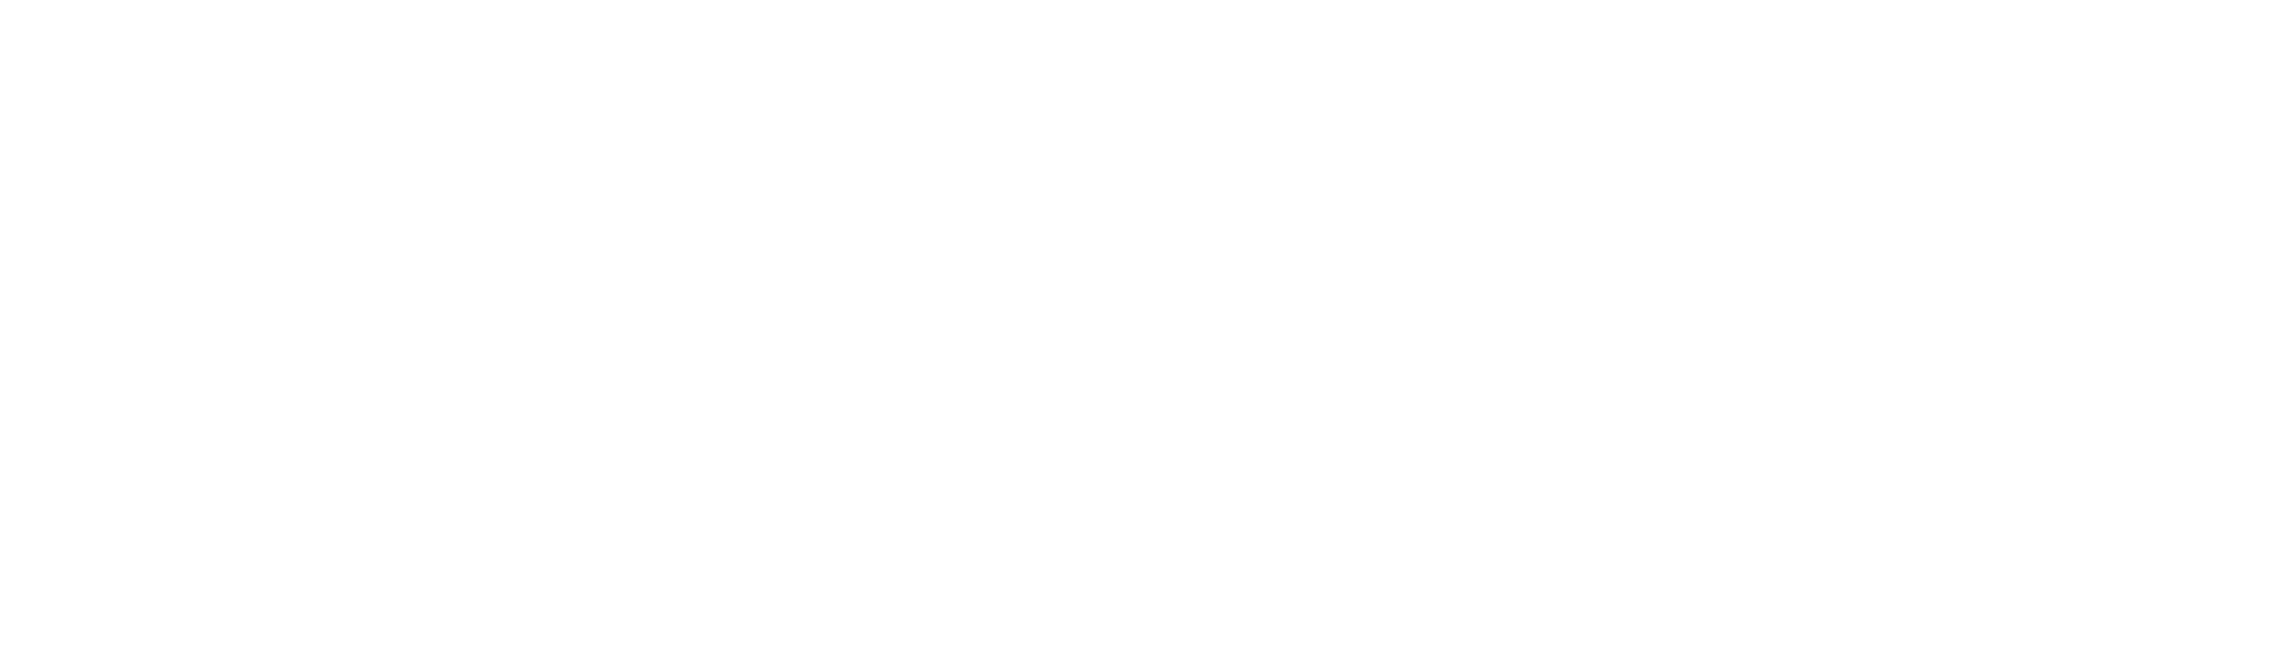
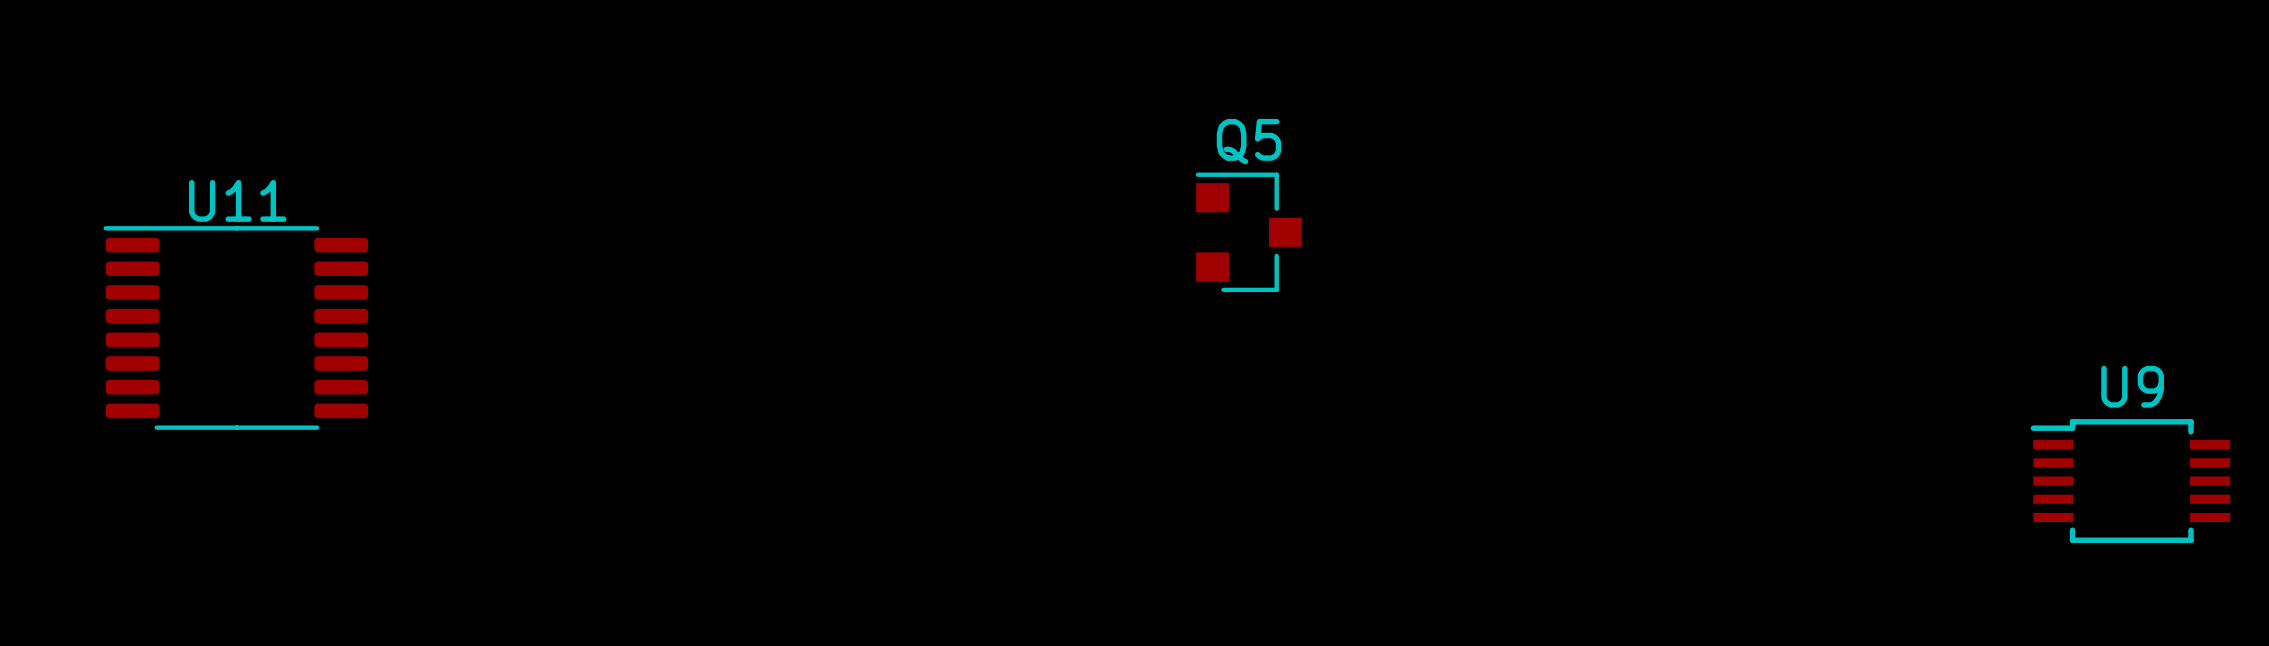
Q5: none -> (1248, 232)
U11: none -> (235, 327)
U9: none -> (2130, 481)

